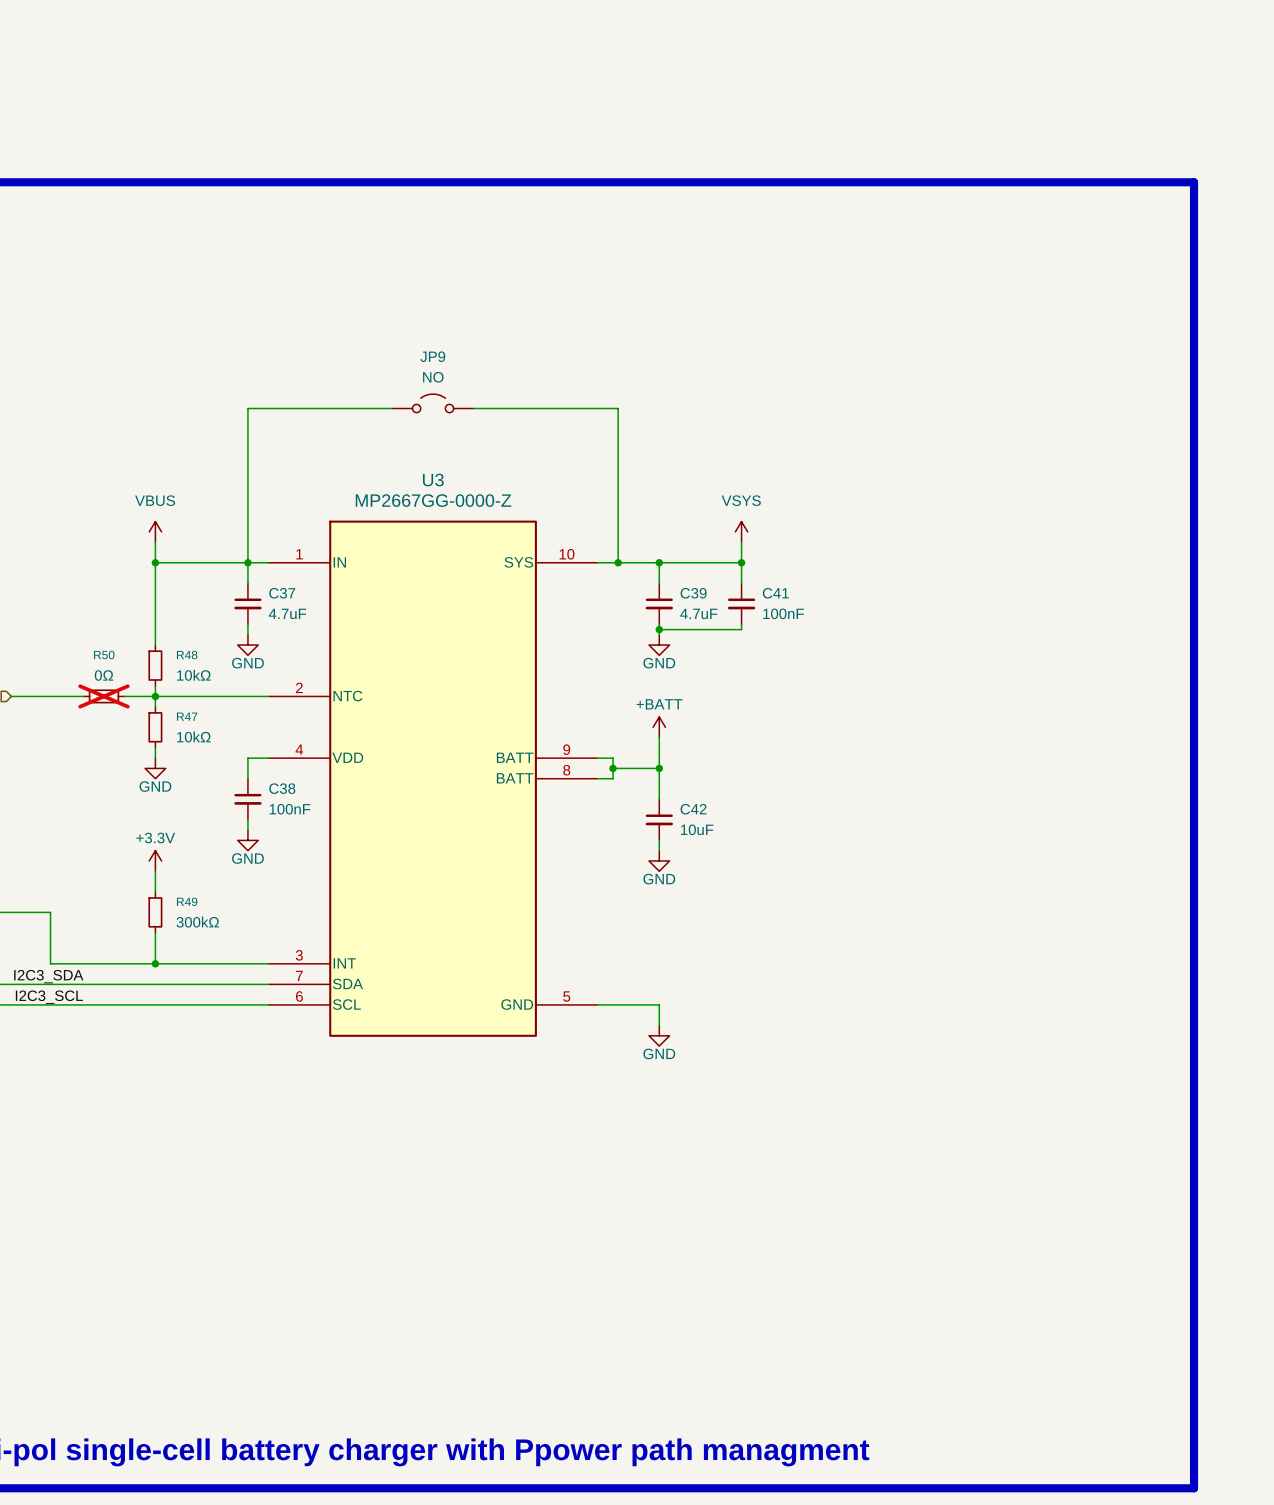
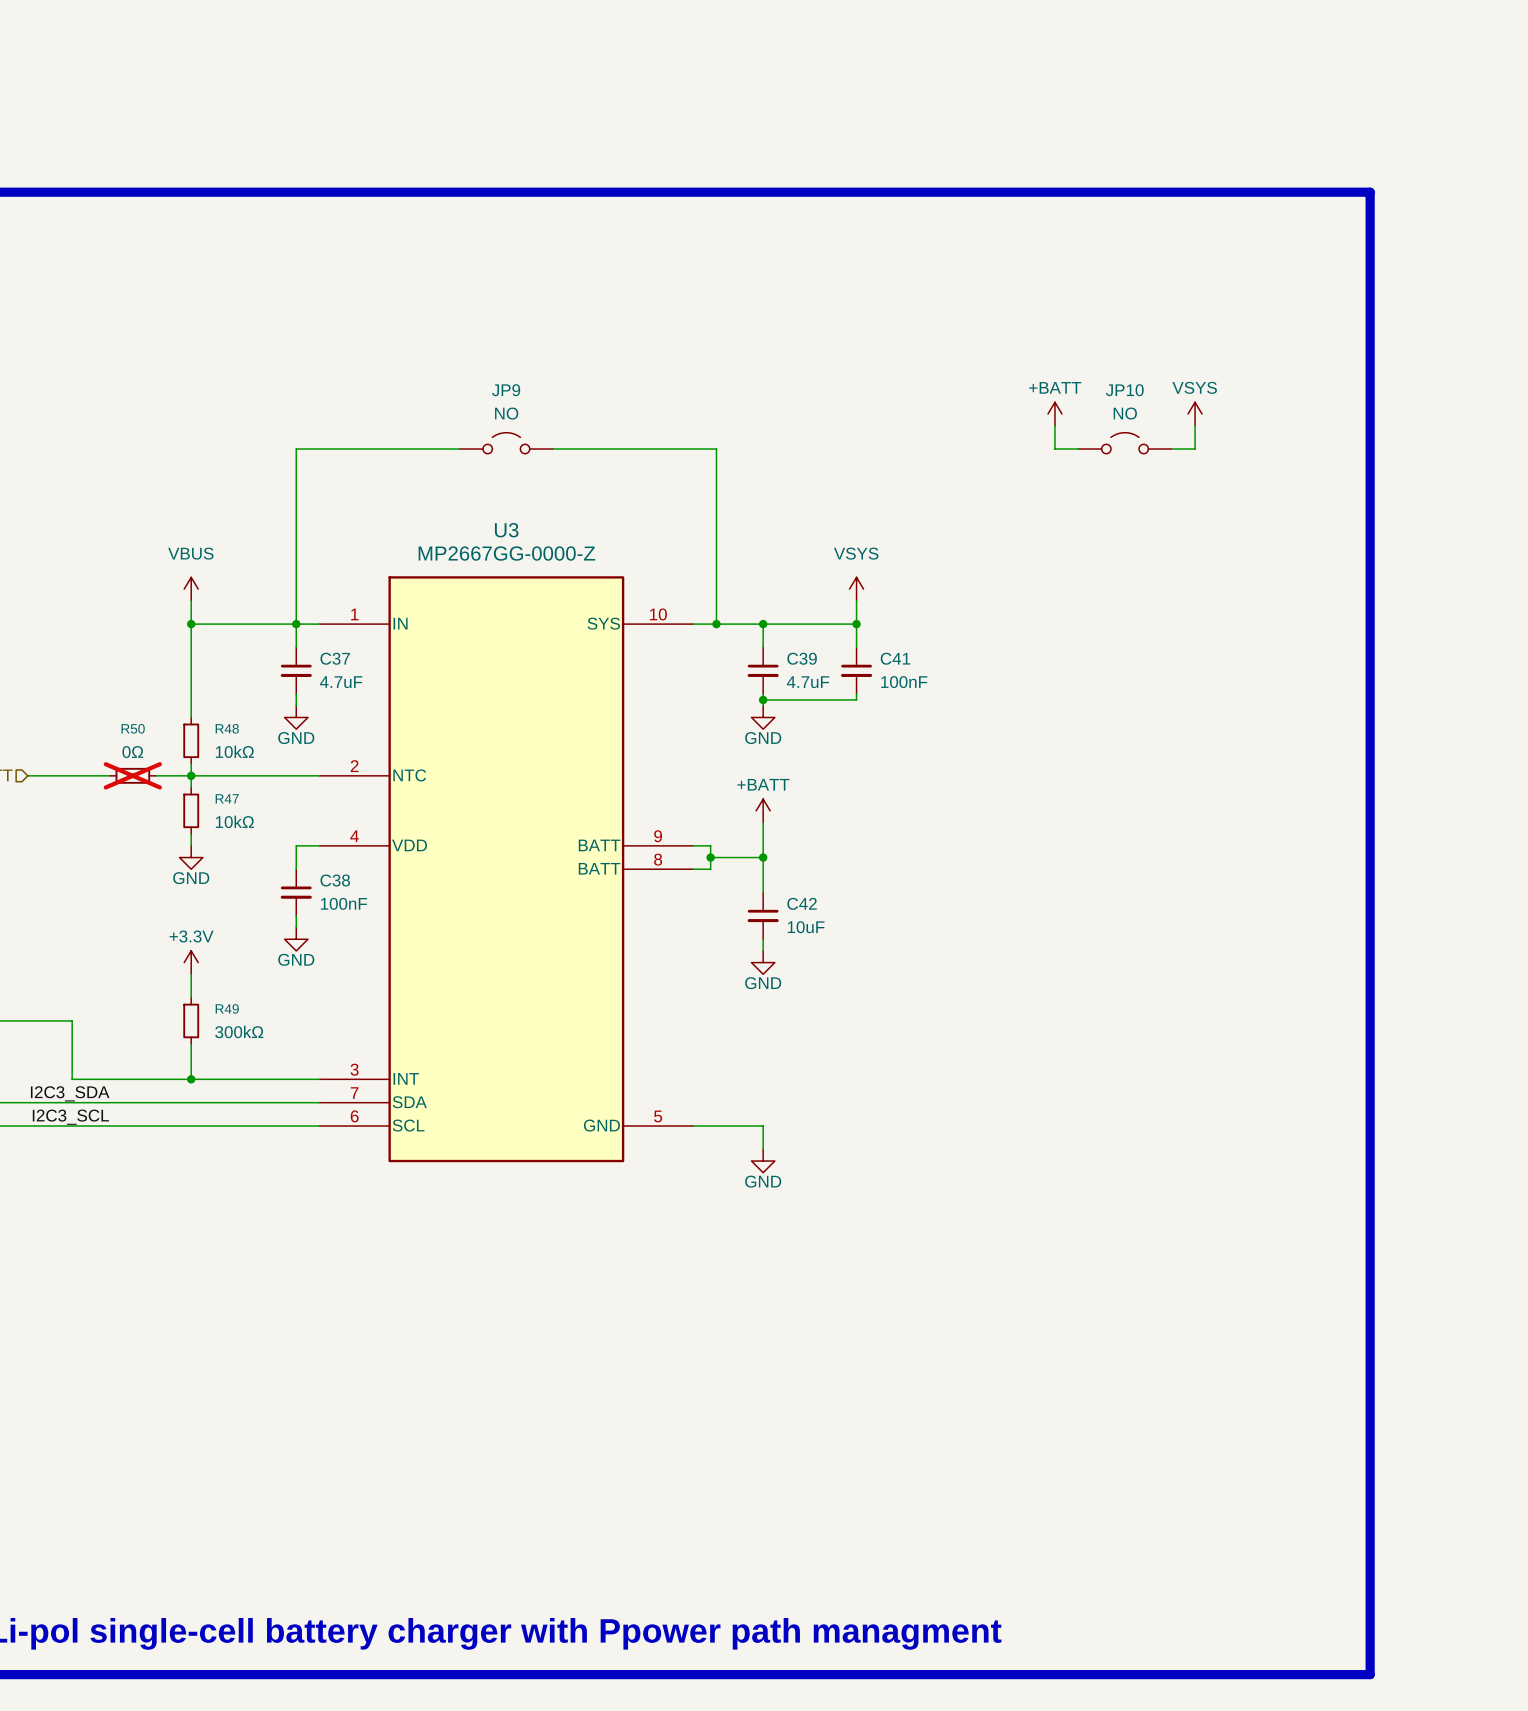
power symbol: none -> +BATT (1054, 413)
power symbol: none -> VSYS (1195, 413)
wire: none -> (1054, 425) (1054, 449) (1078, 449)
wire: none -> (1195, 425) (1195, 449) (1171, 449)
JP10: none -> NO (1125, 443)

